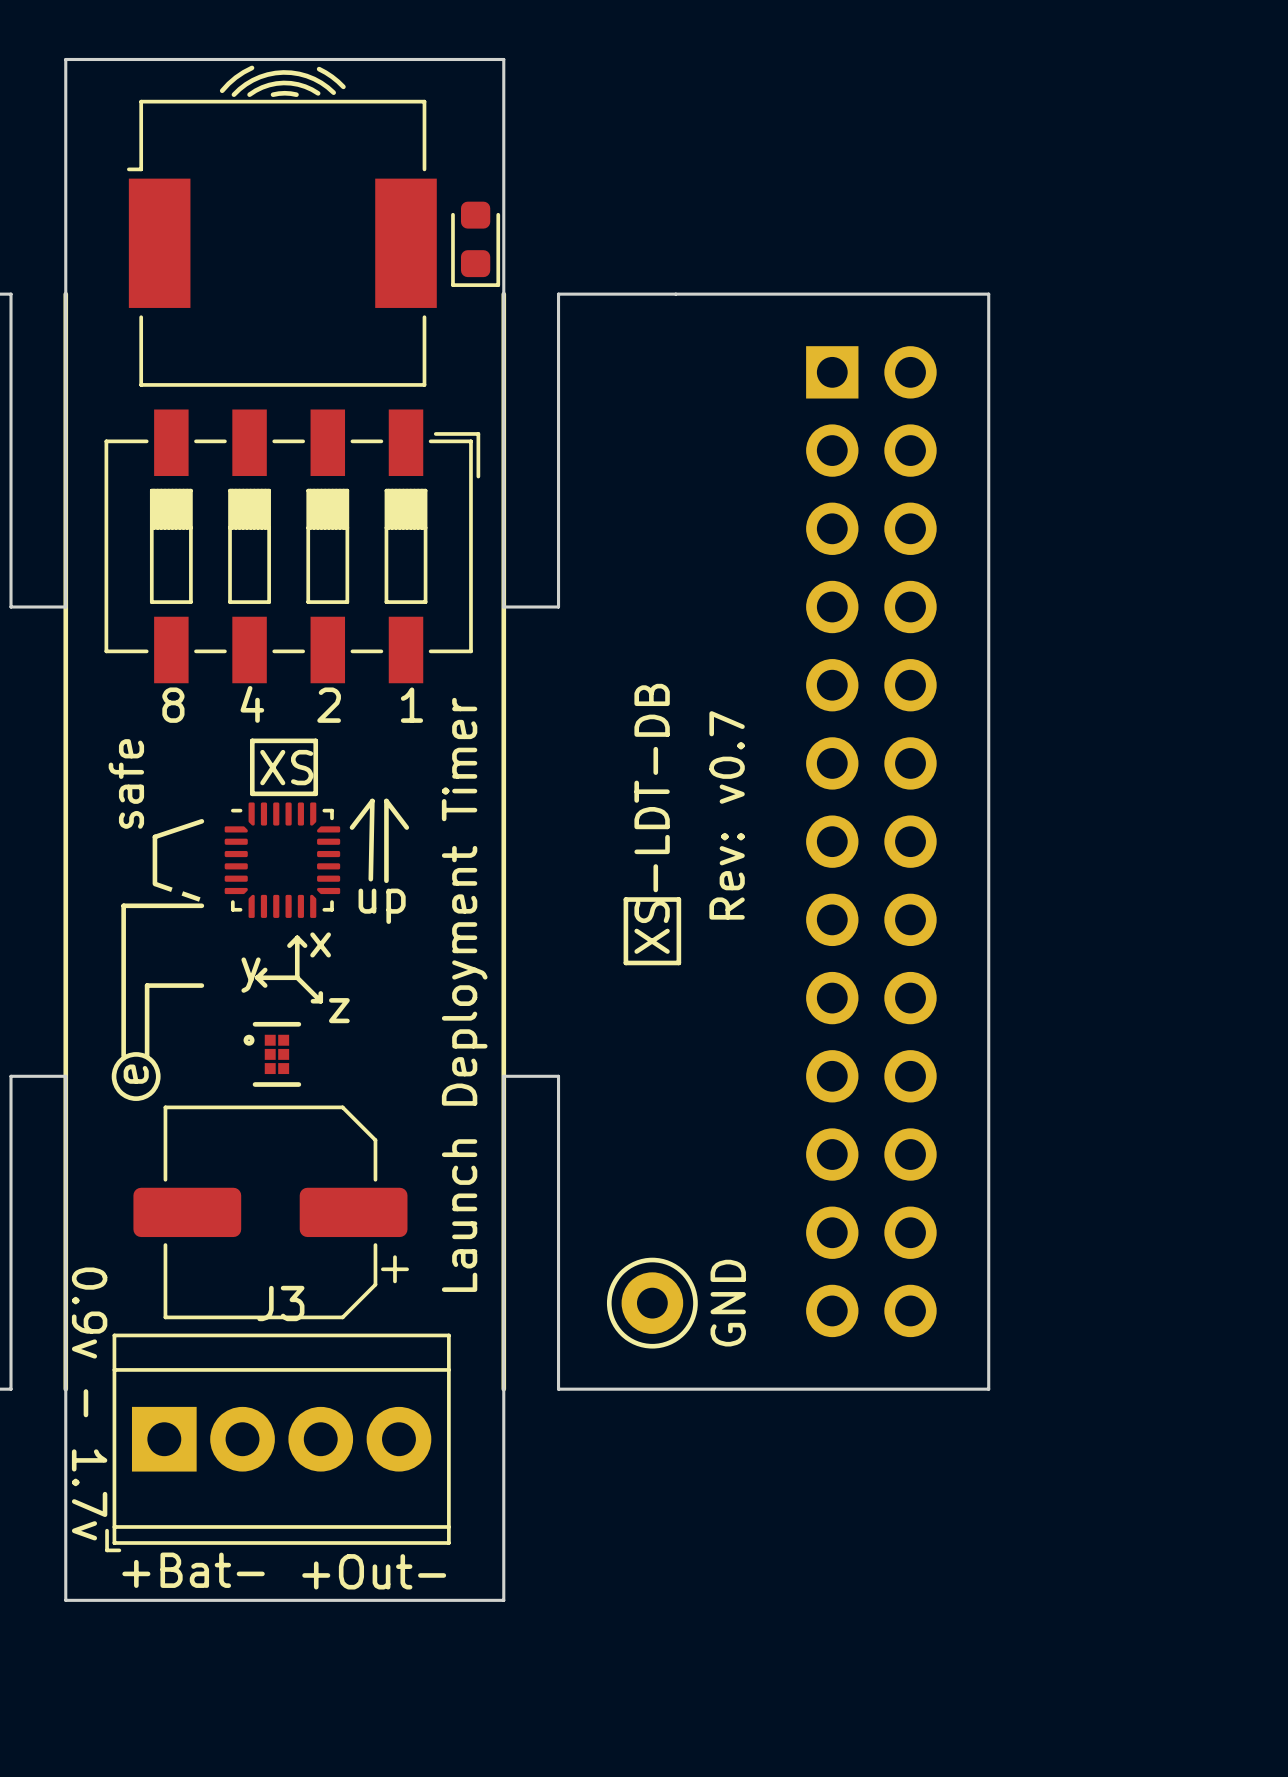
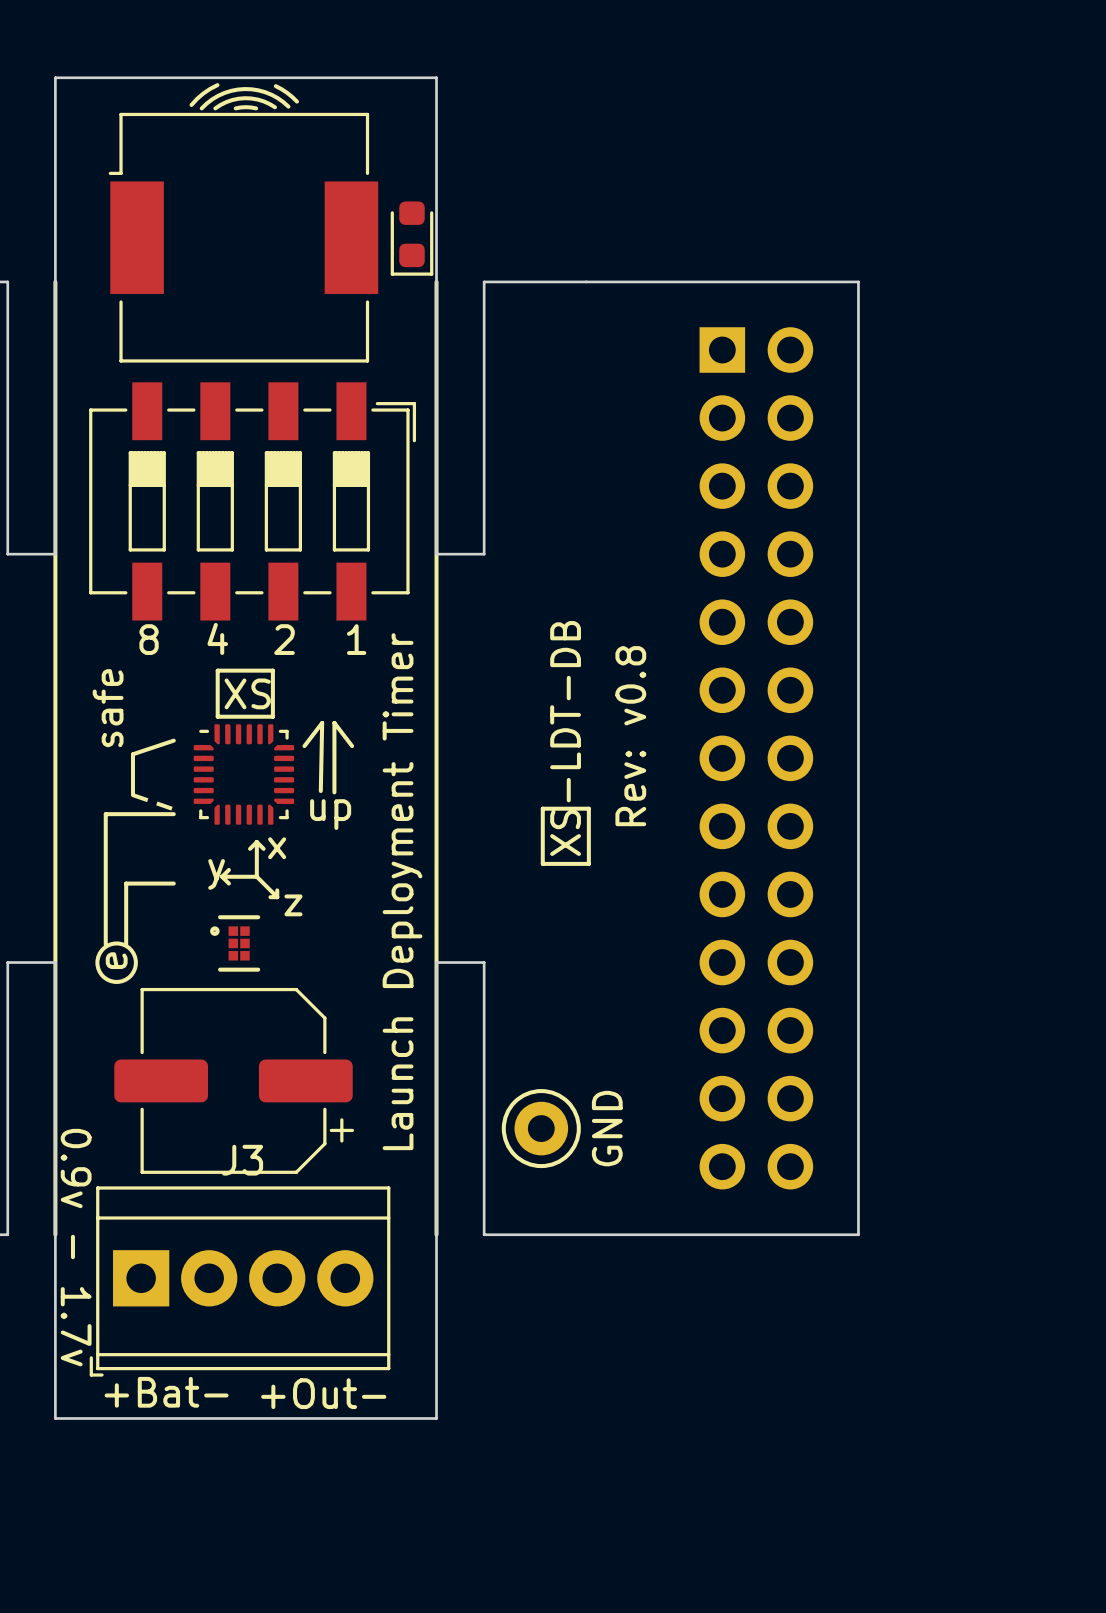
text: Rev: v0.7 (727, 815) -> Rev: v0.8 (630, 736)
part position: (652, 1303) -> (541, 1128)

